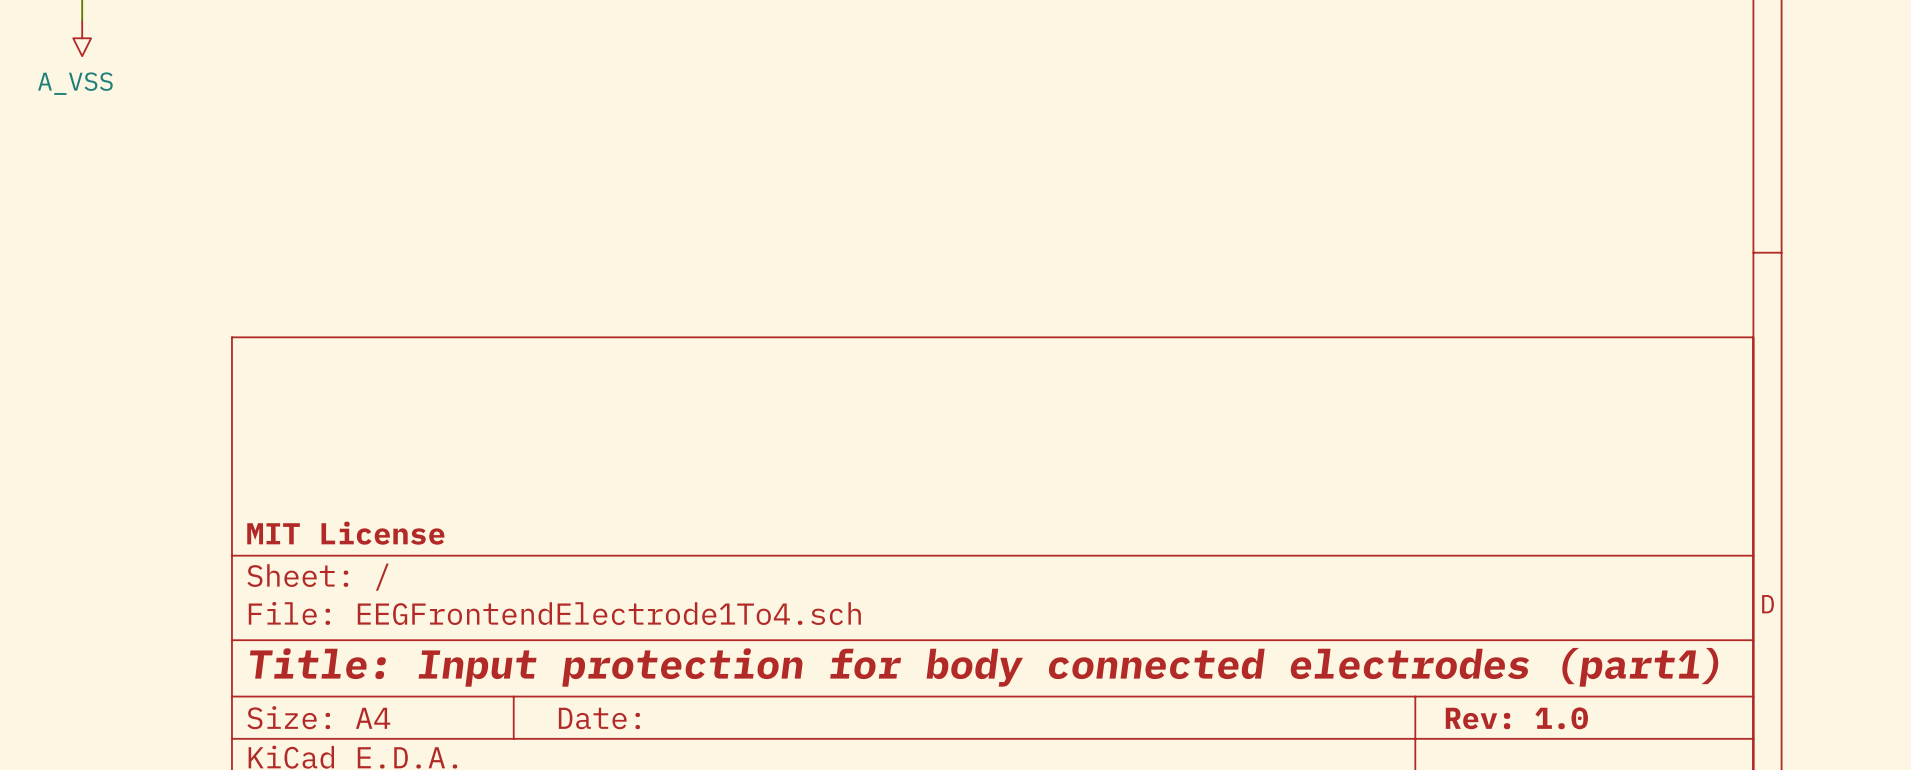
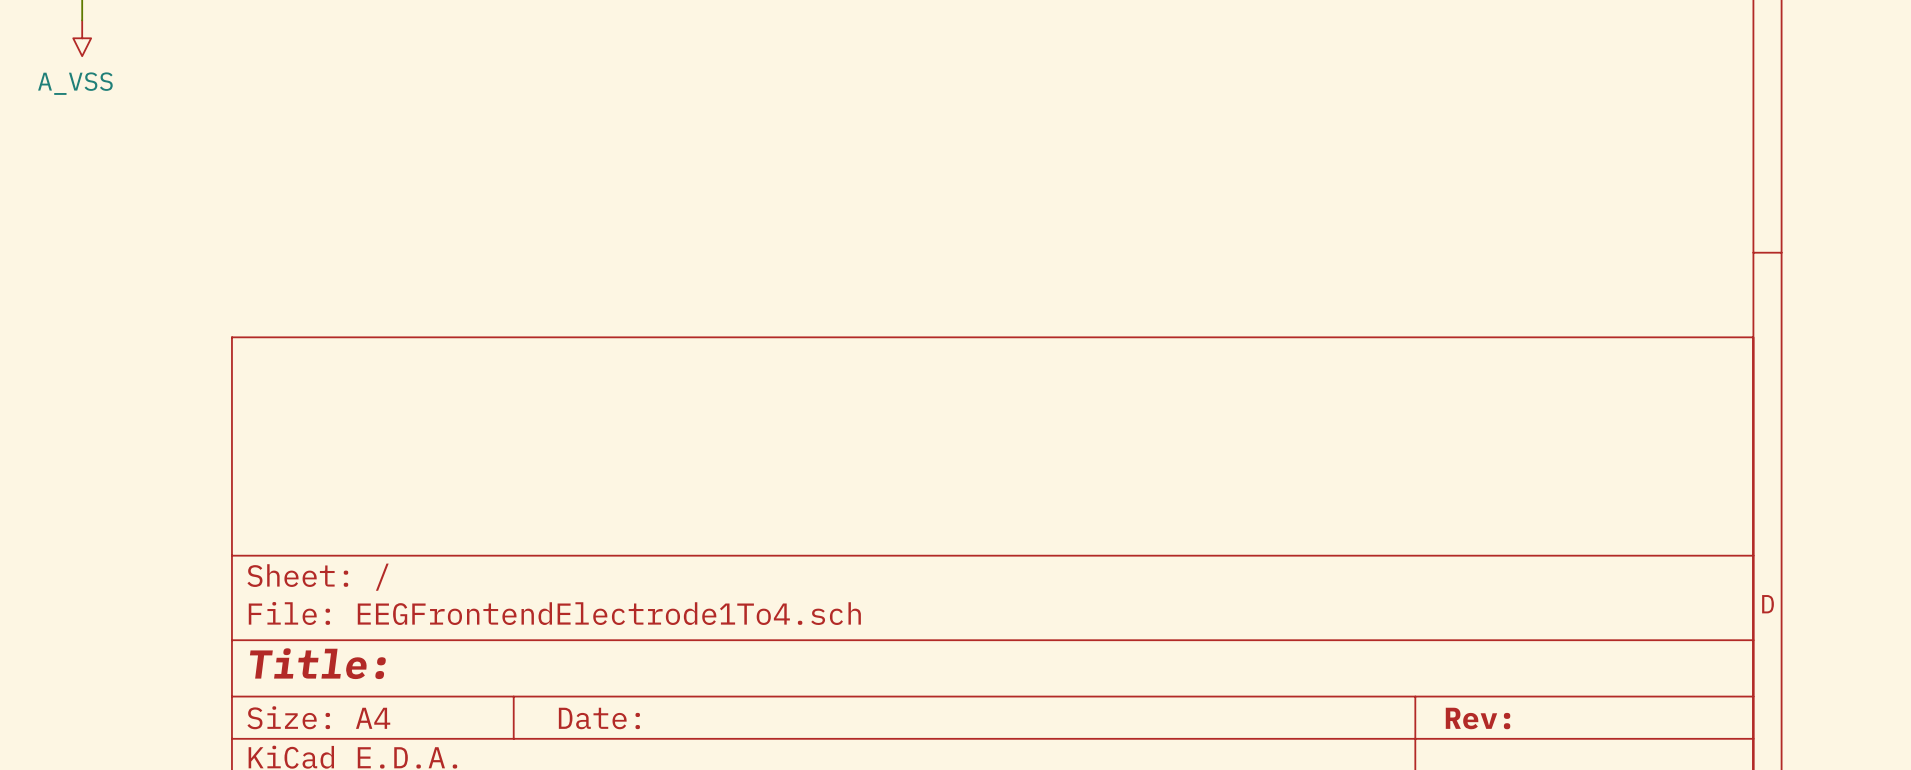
title block: MIT License (345, 533) -> none
title block: Title: Input protection for body connected electrodes (part1) (984, 667) -> Title: (317, 663)
title block: Rev: 1.0 (1516, 718) -> Rev: (1478, 718)

